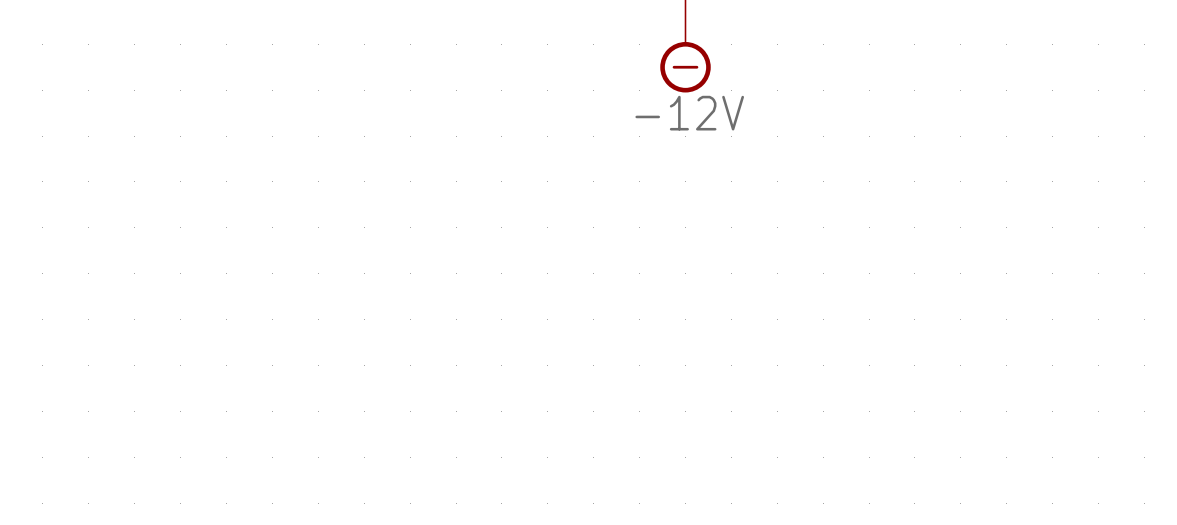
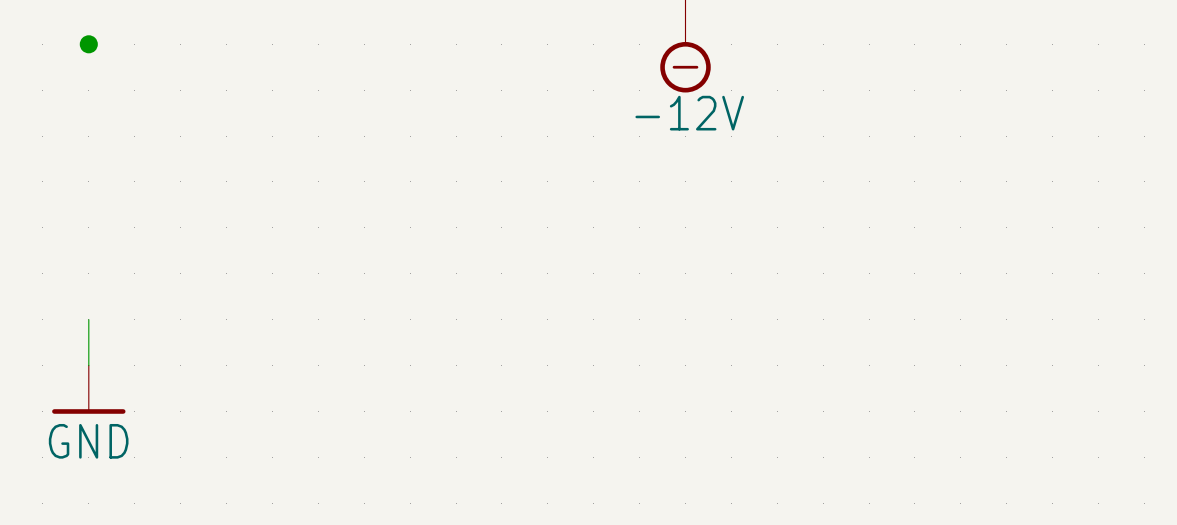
junction: none -> (88, 44)
wire: none -> (88, 319) (88, 365)
power symbol: none -> GND (88, 389)

